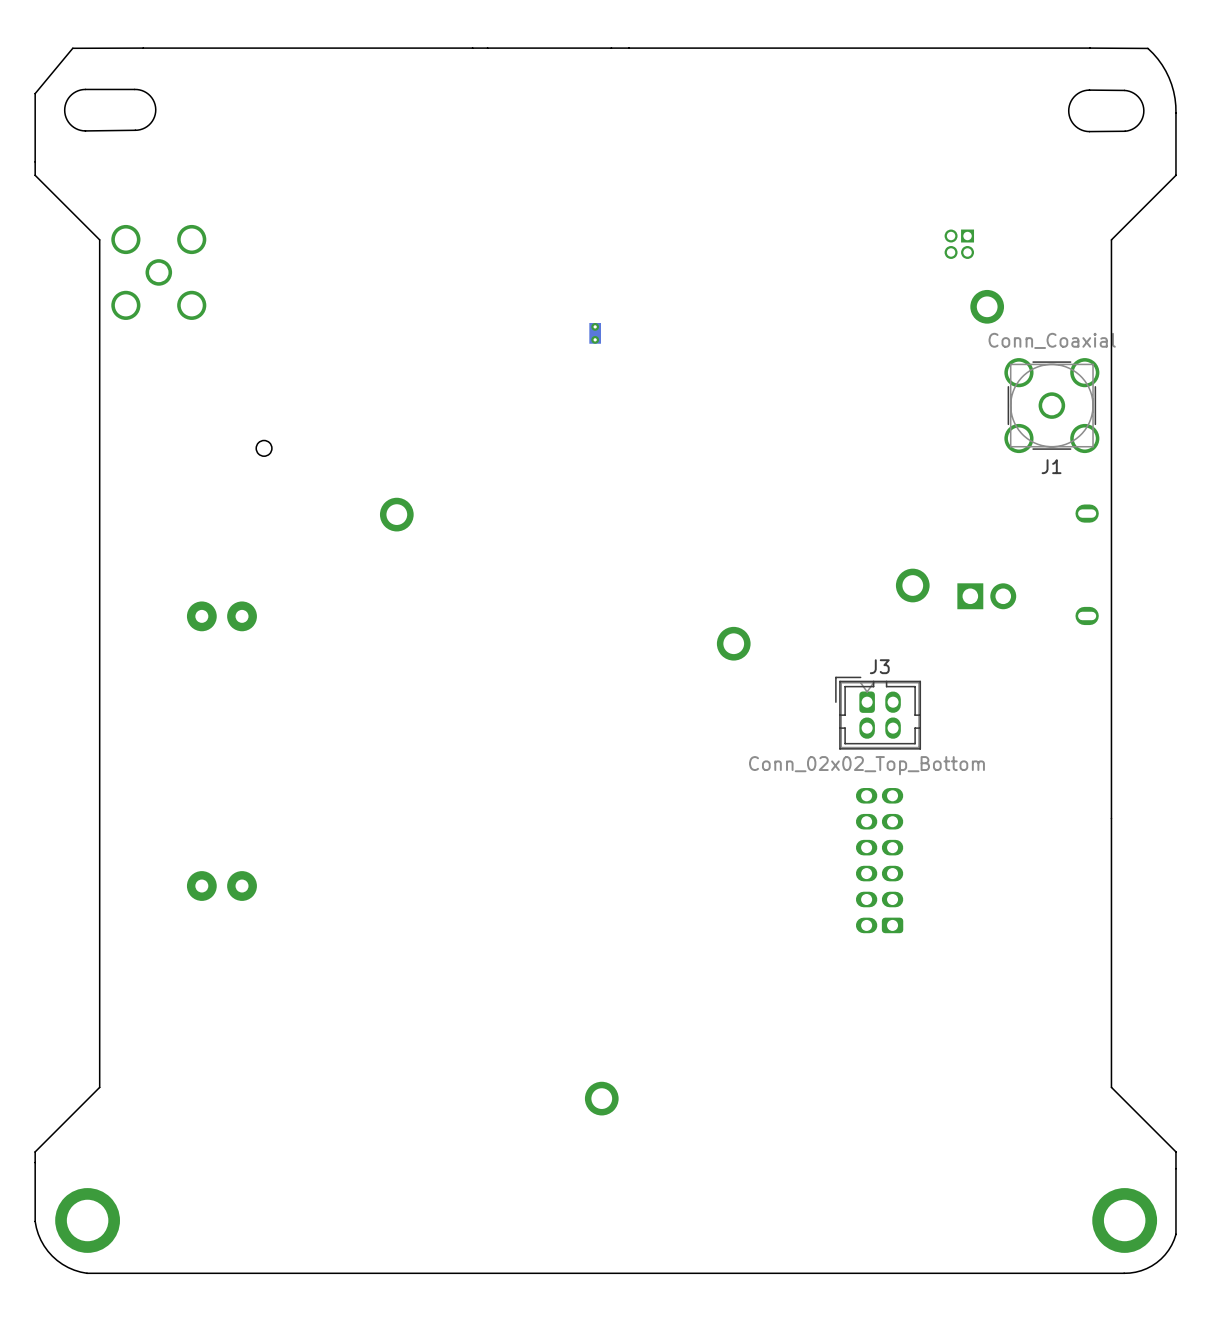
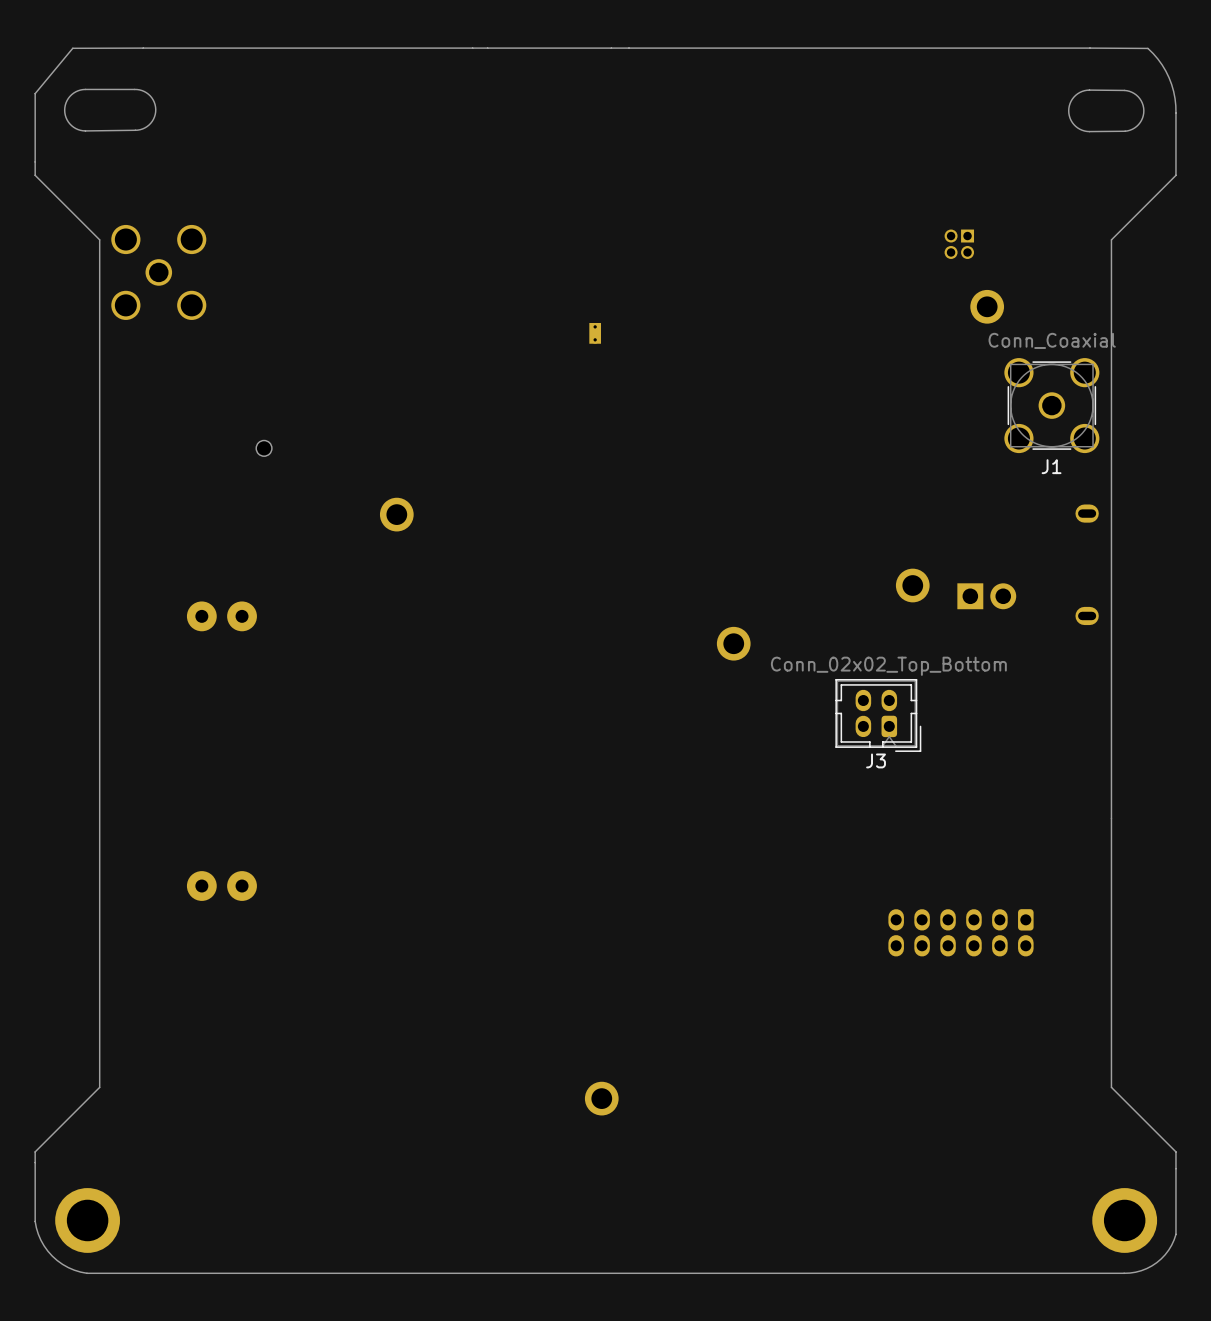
J3 rotation: 0° (878, 713) -> 180° (878, 715)
part rotation: 0° (879, 860) -> 90° counterclockwise (960, 932)
part position: (879, 860) -> (960, 932)

